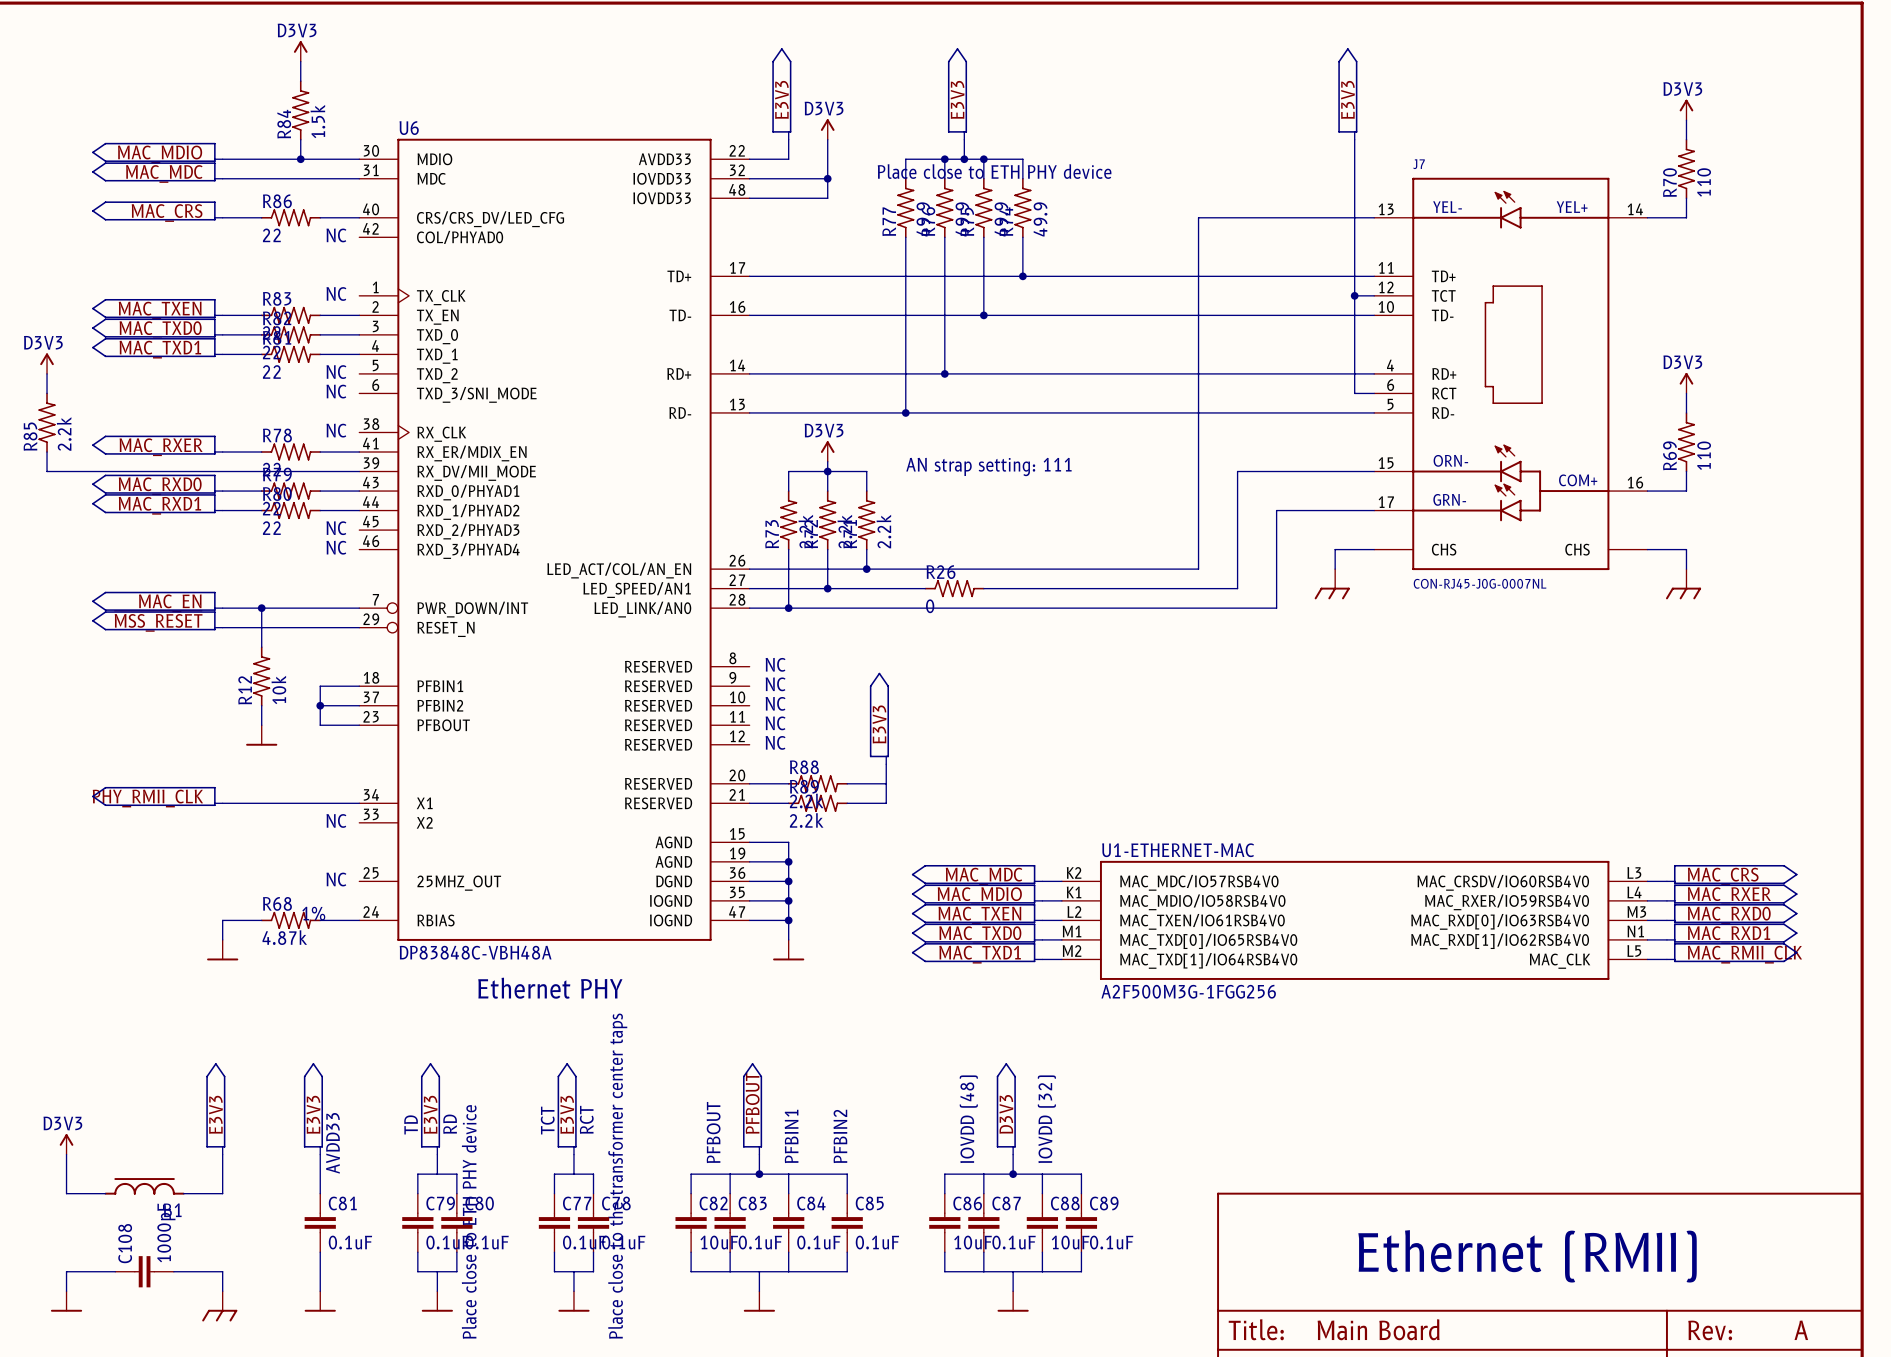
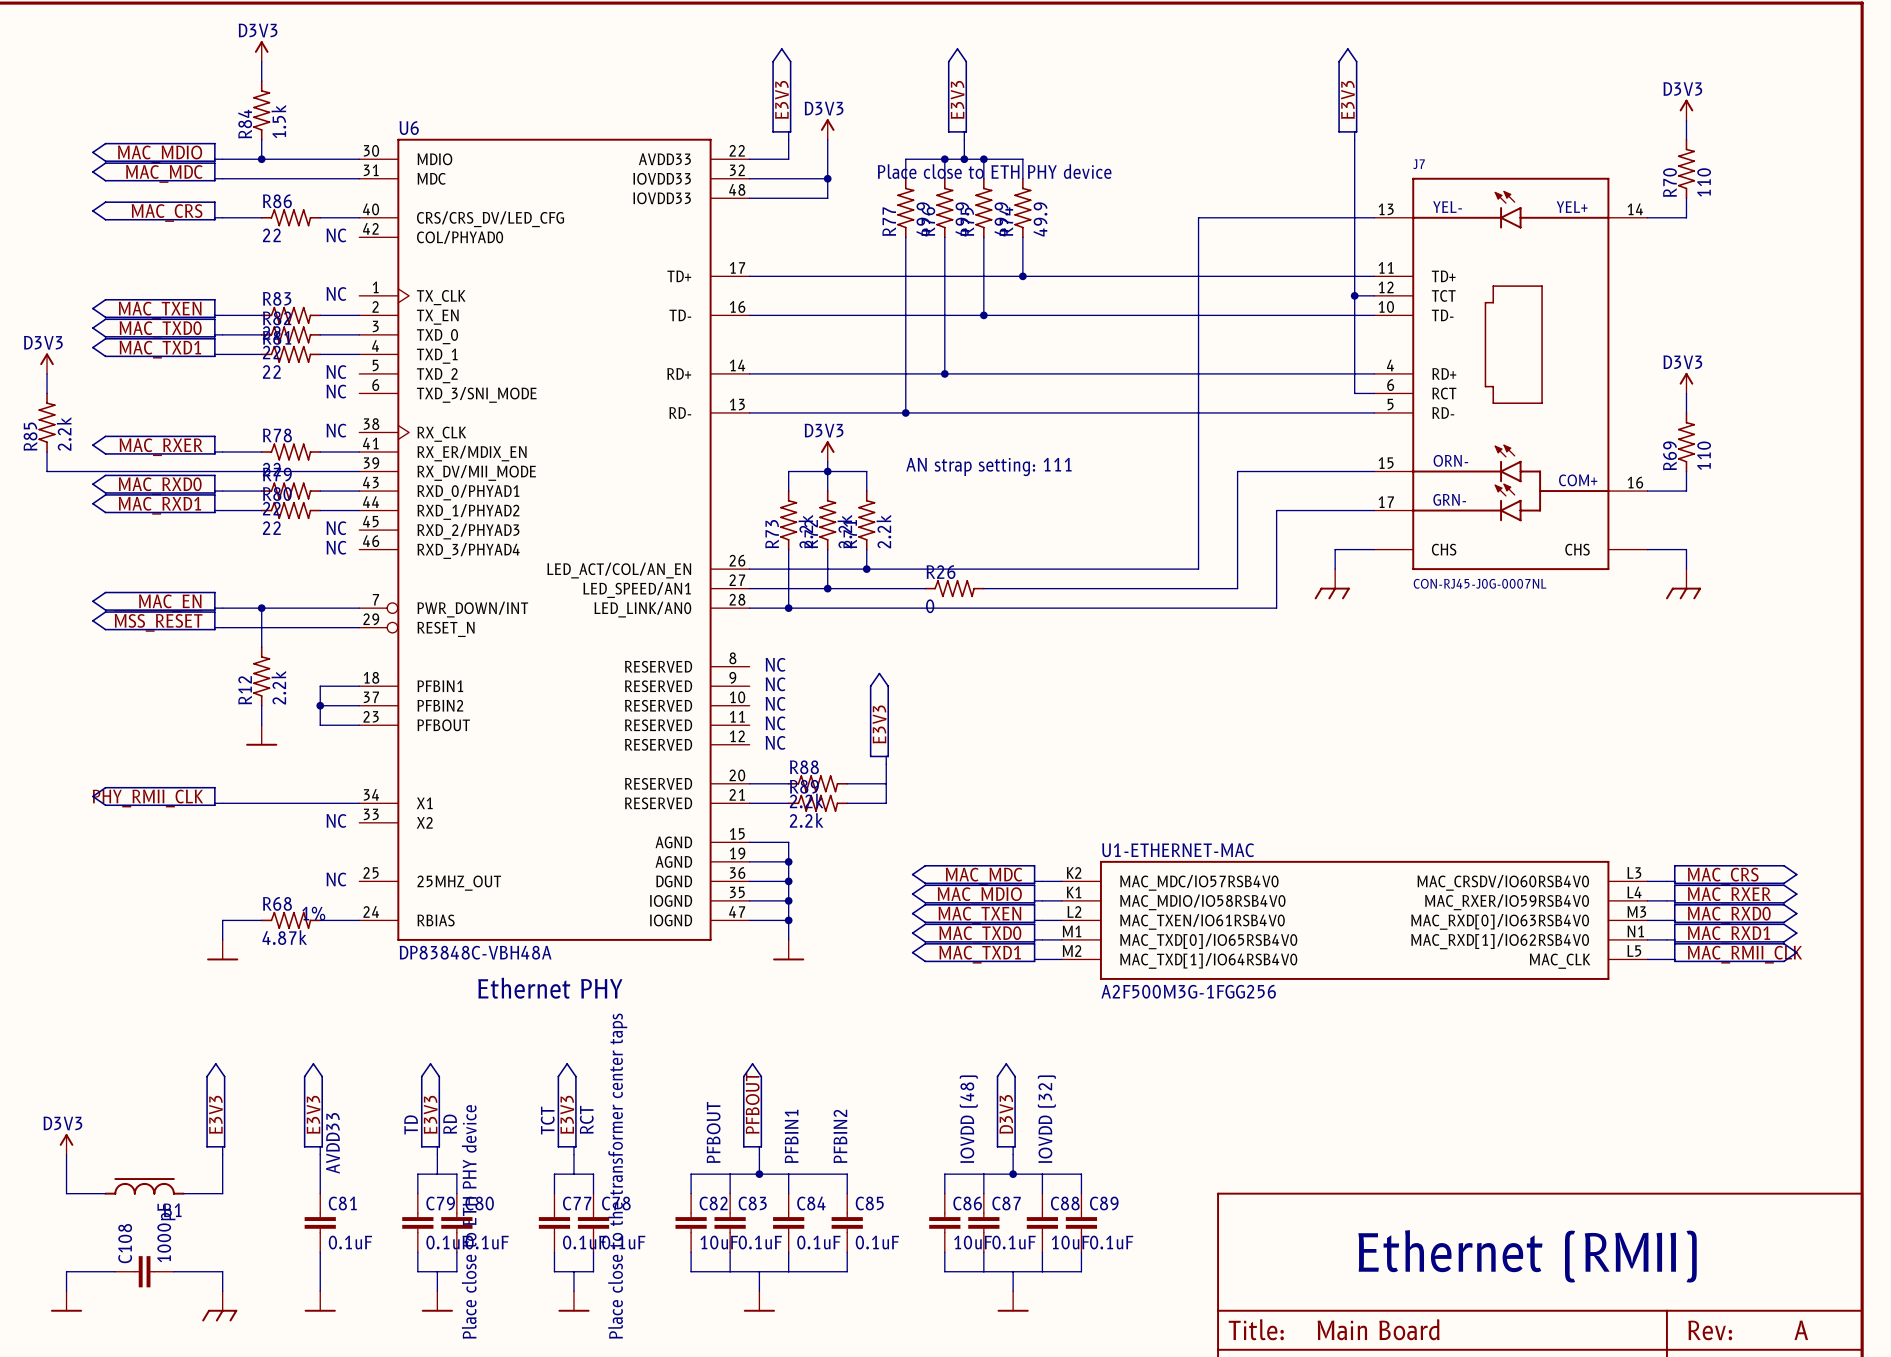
power symbol position: D3V3 (300, 51) -> D3V3 (261, 51)
wire: (300, 61) (300, 81) -> (261, 61) (261, 81)
R84 position: (300, 110) -> (261, 110)
wire: (300, 139) (300, 159) -> (261, 139) (261, 159)
junction position: (300, 159) -> (261, 159)
R12 value: 10k (278, 689) -> 2.2k (278, 687)

